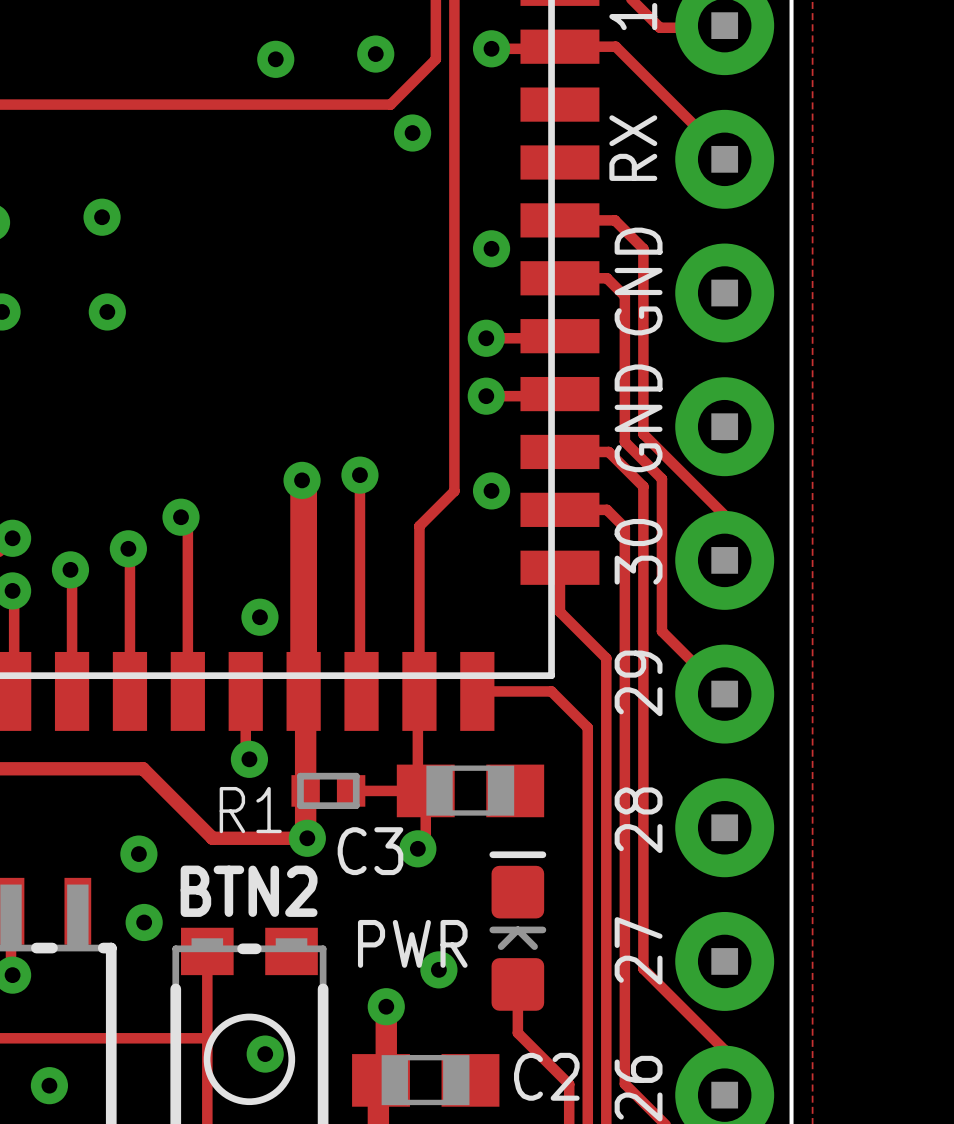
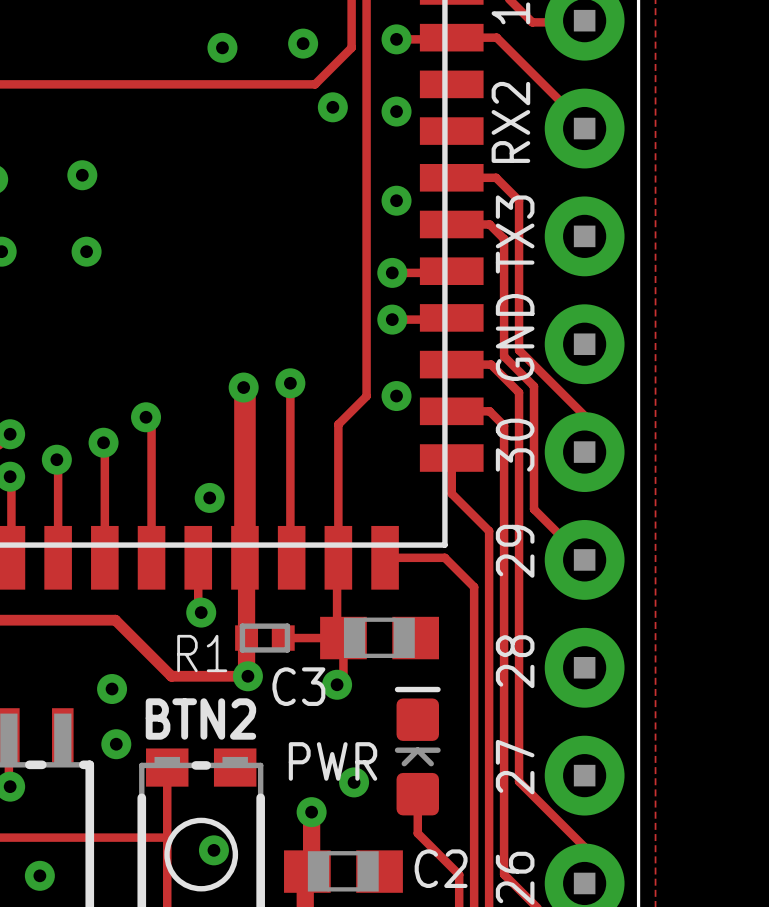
via: none -> (396, 111)
text: RX (633, 148) -> RX2 (510, 122)
text: GND (638, 281) -> TX3 (515, 234)

